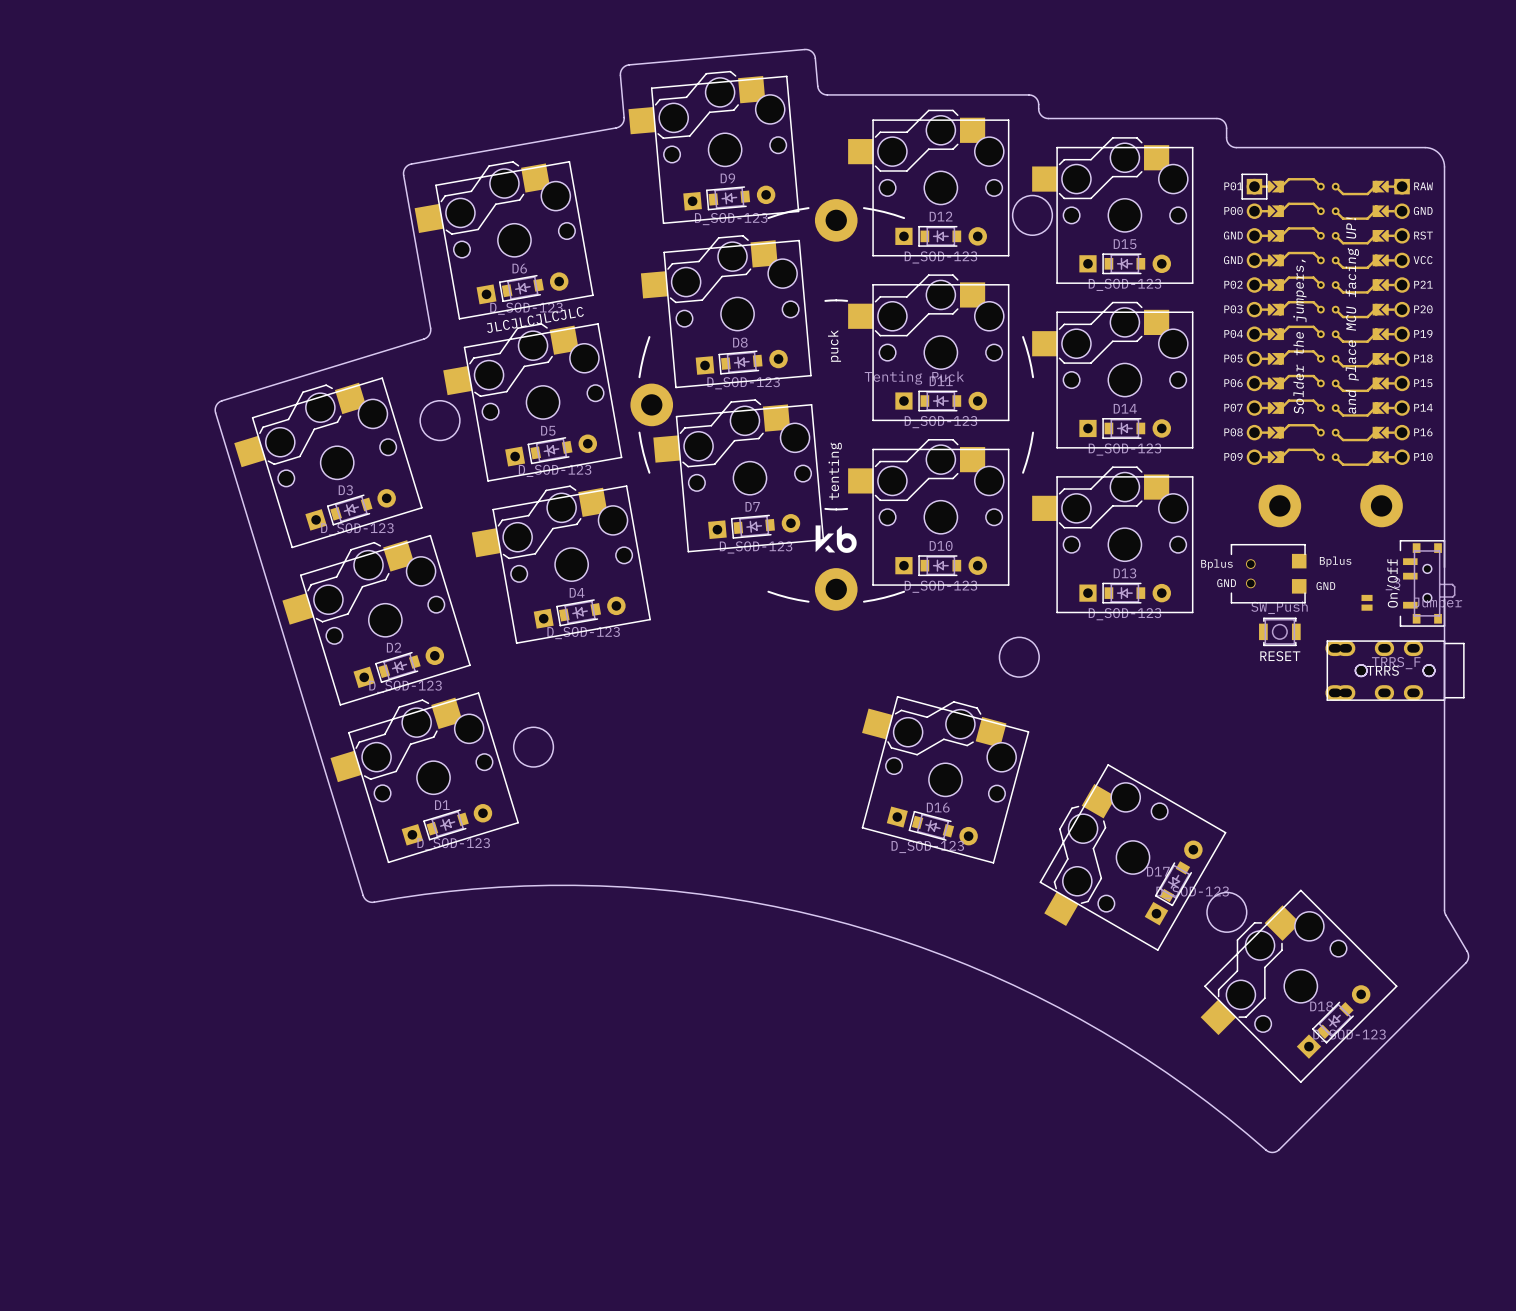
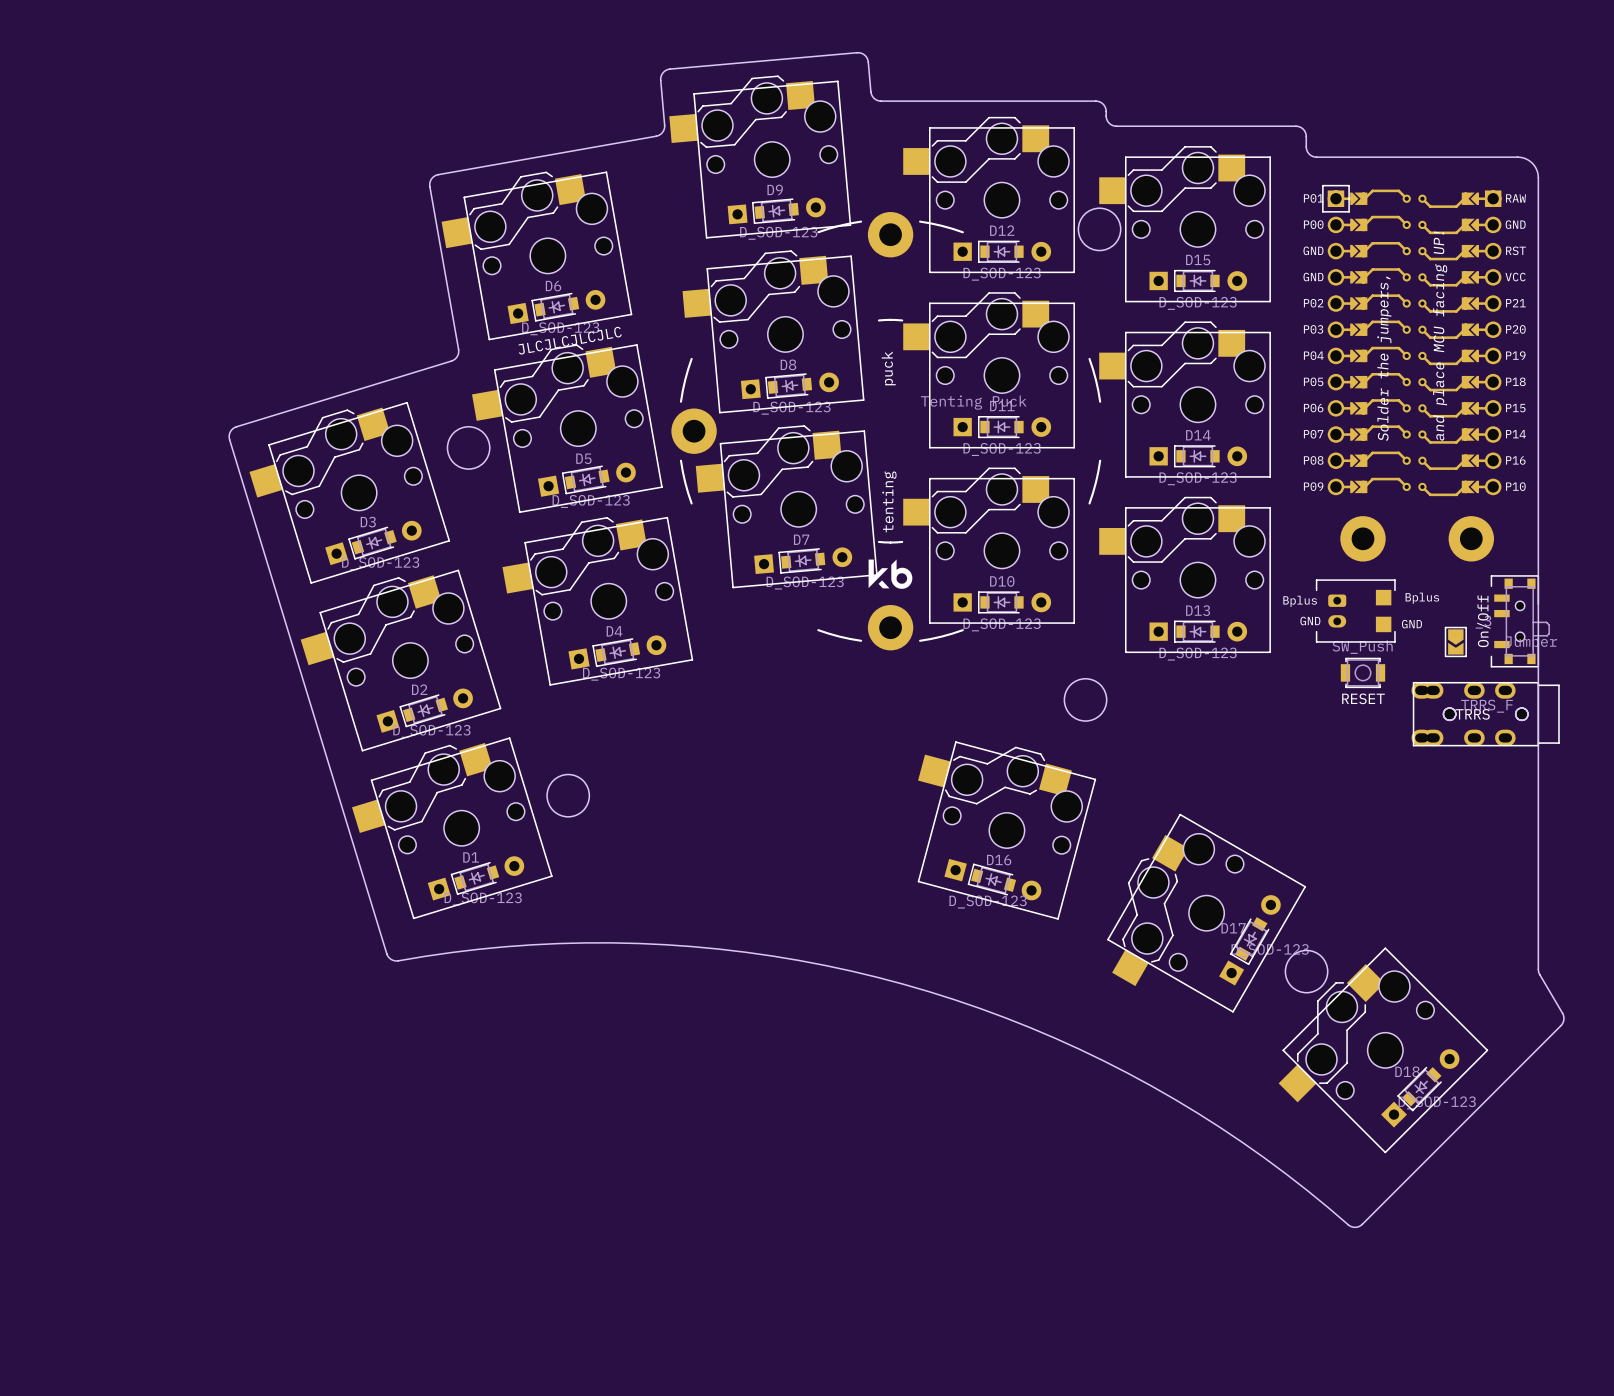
part footprint: [1230, 544, 1306, 604] -> [1315, 579, 1396, 643]
part footprint: [1361, 594, 1373, 611] -> [1444, 626, 1467, 658]

